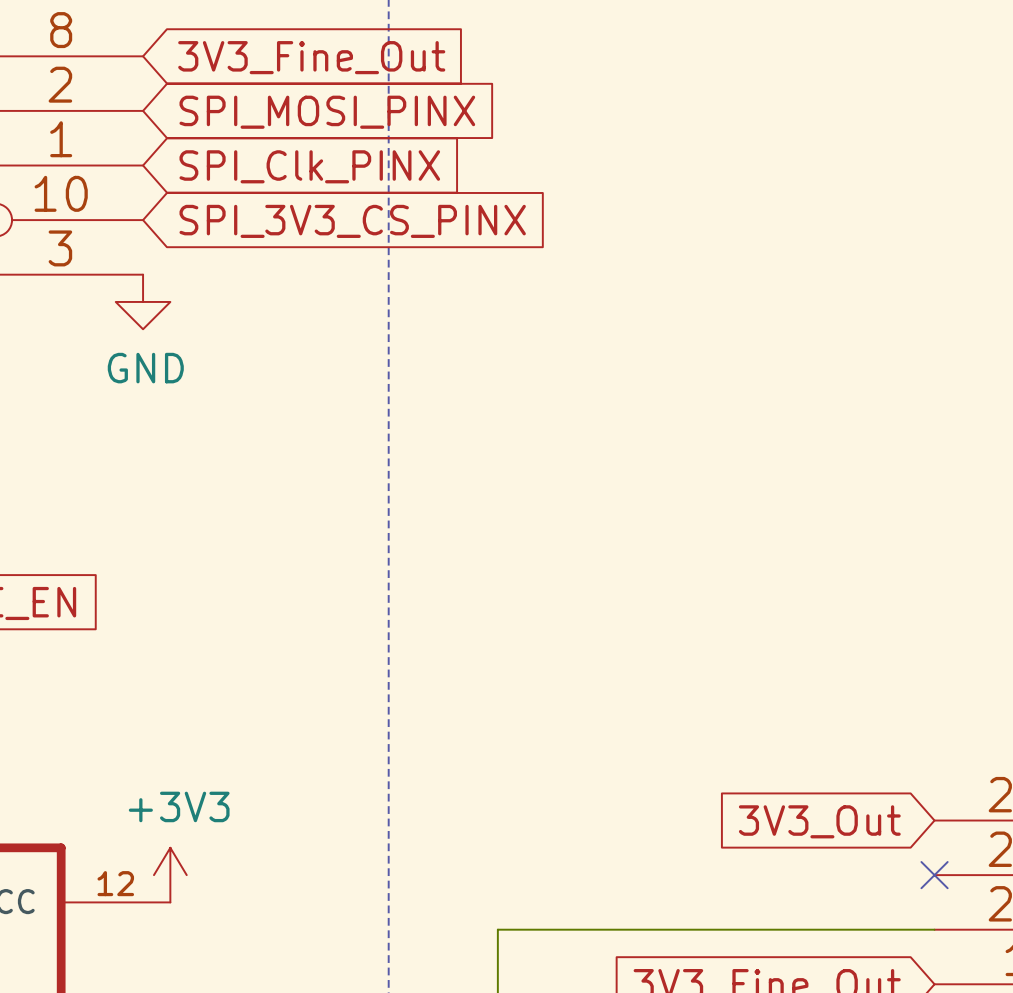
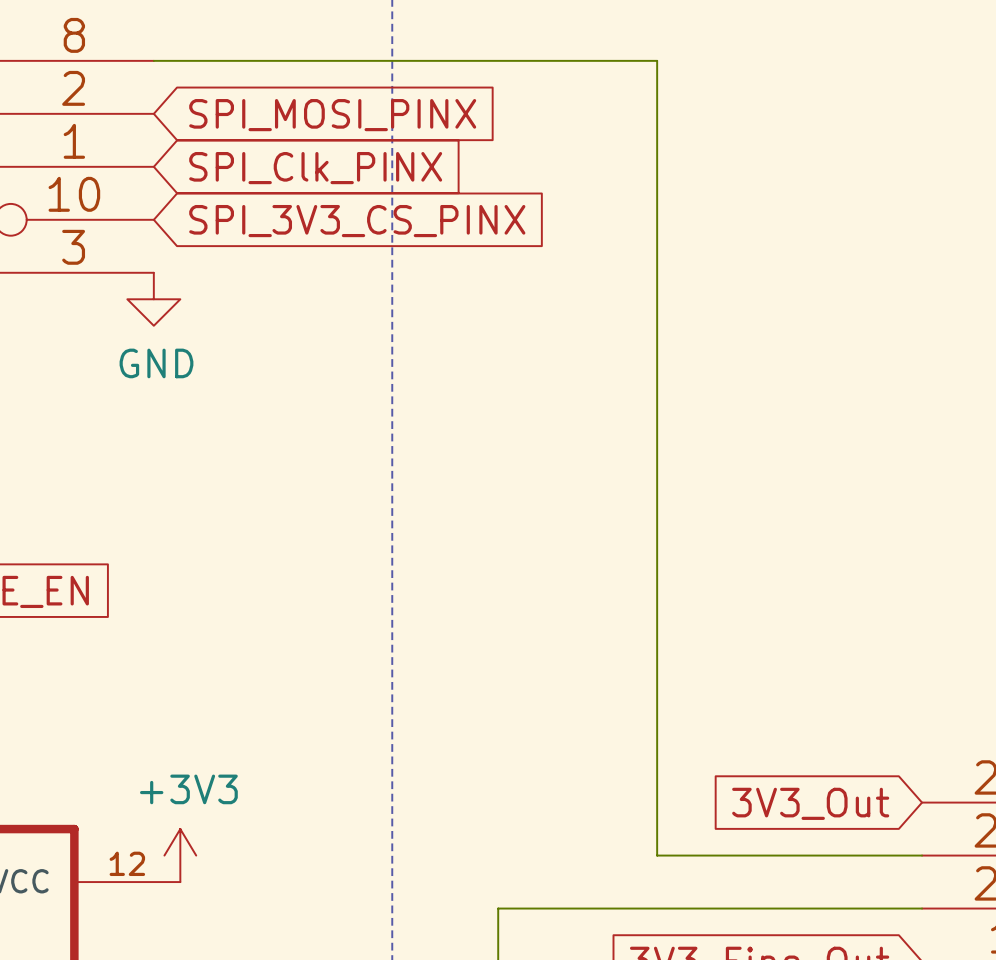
wire: none -> (153, 60) (657, 60) (657, 855) (922, 855)
global label: 3V3_Fine_Out (311, 57) -> none
no-connect mark: (934, 875) -> none

